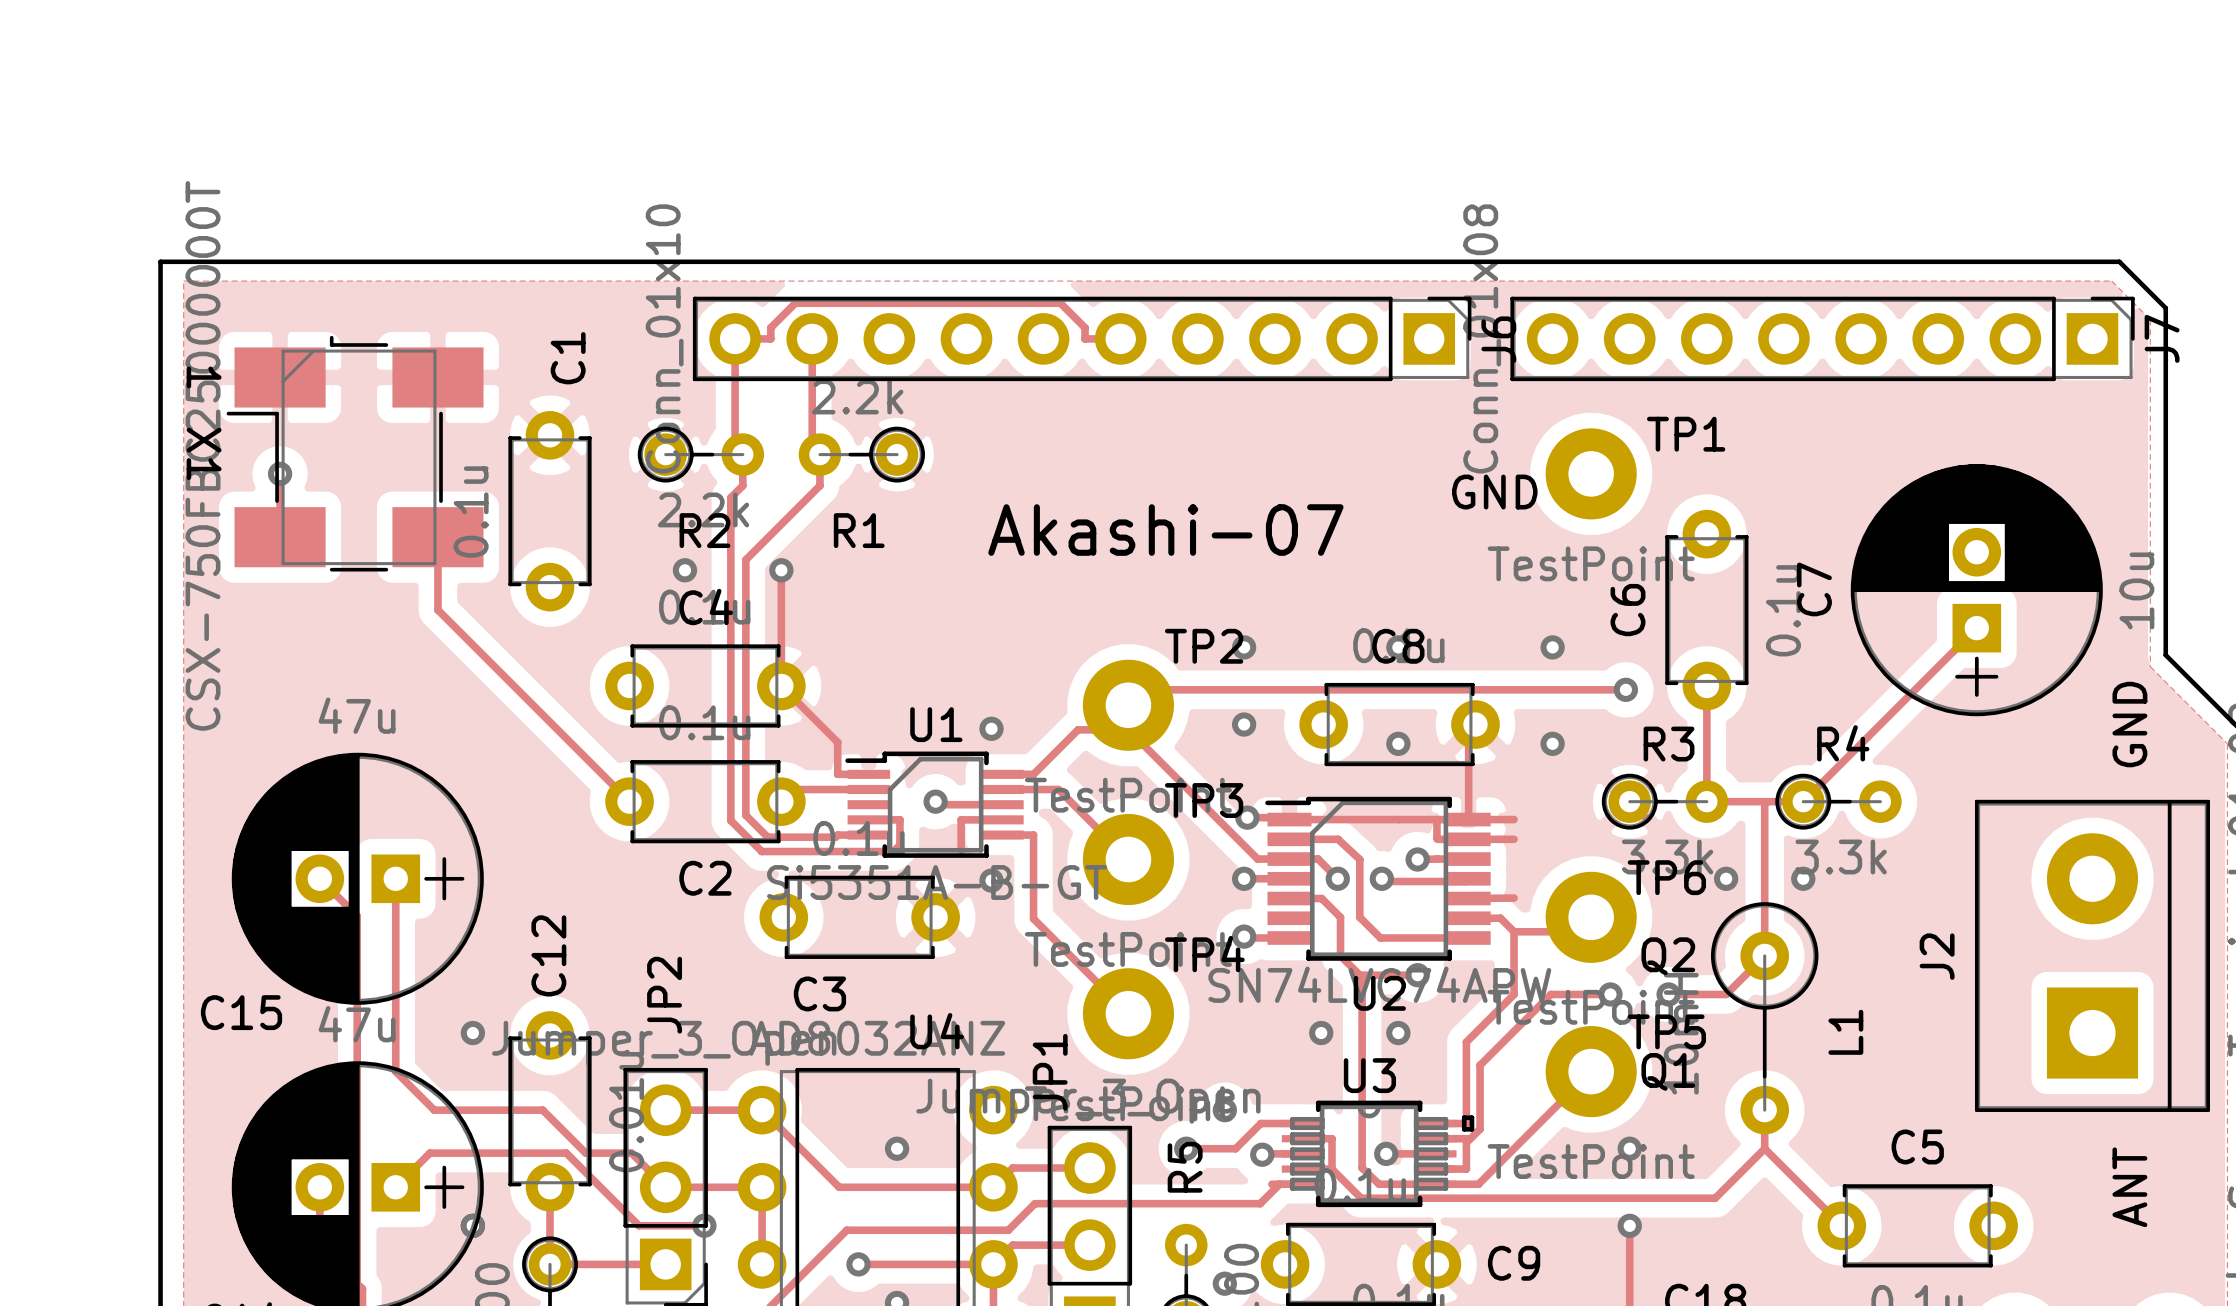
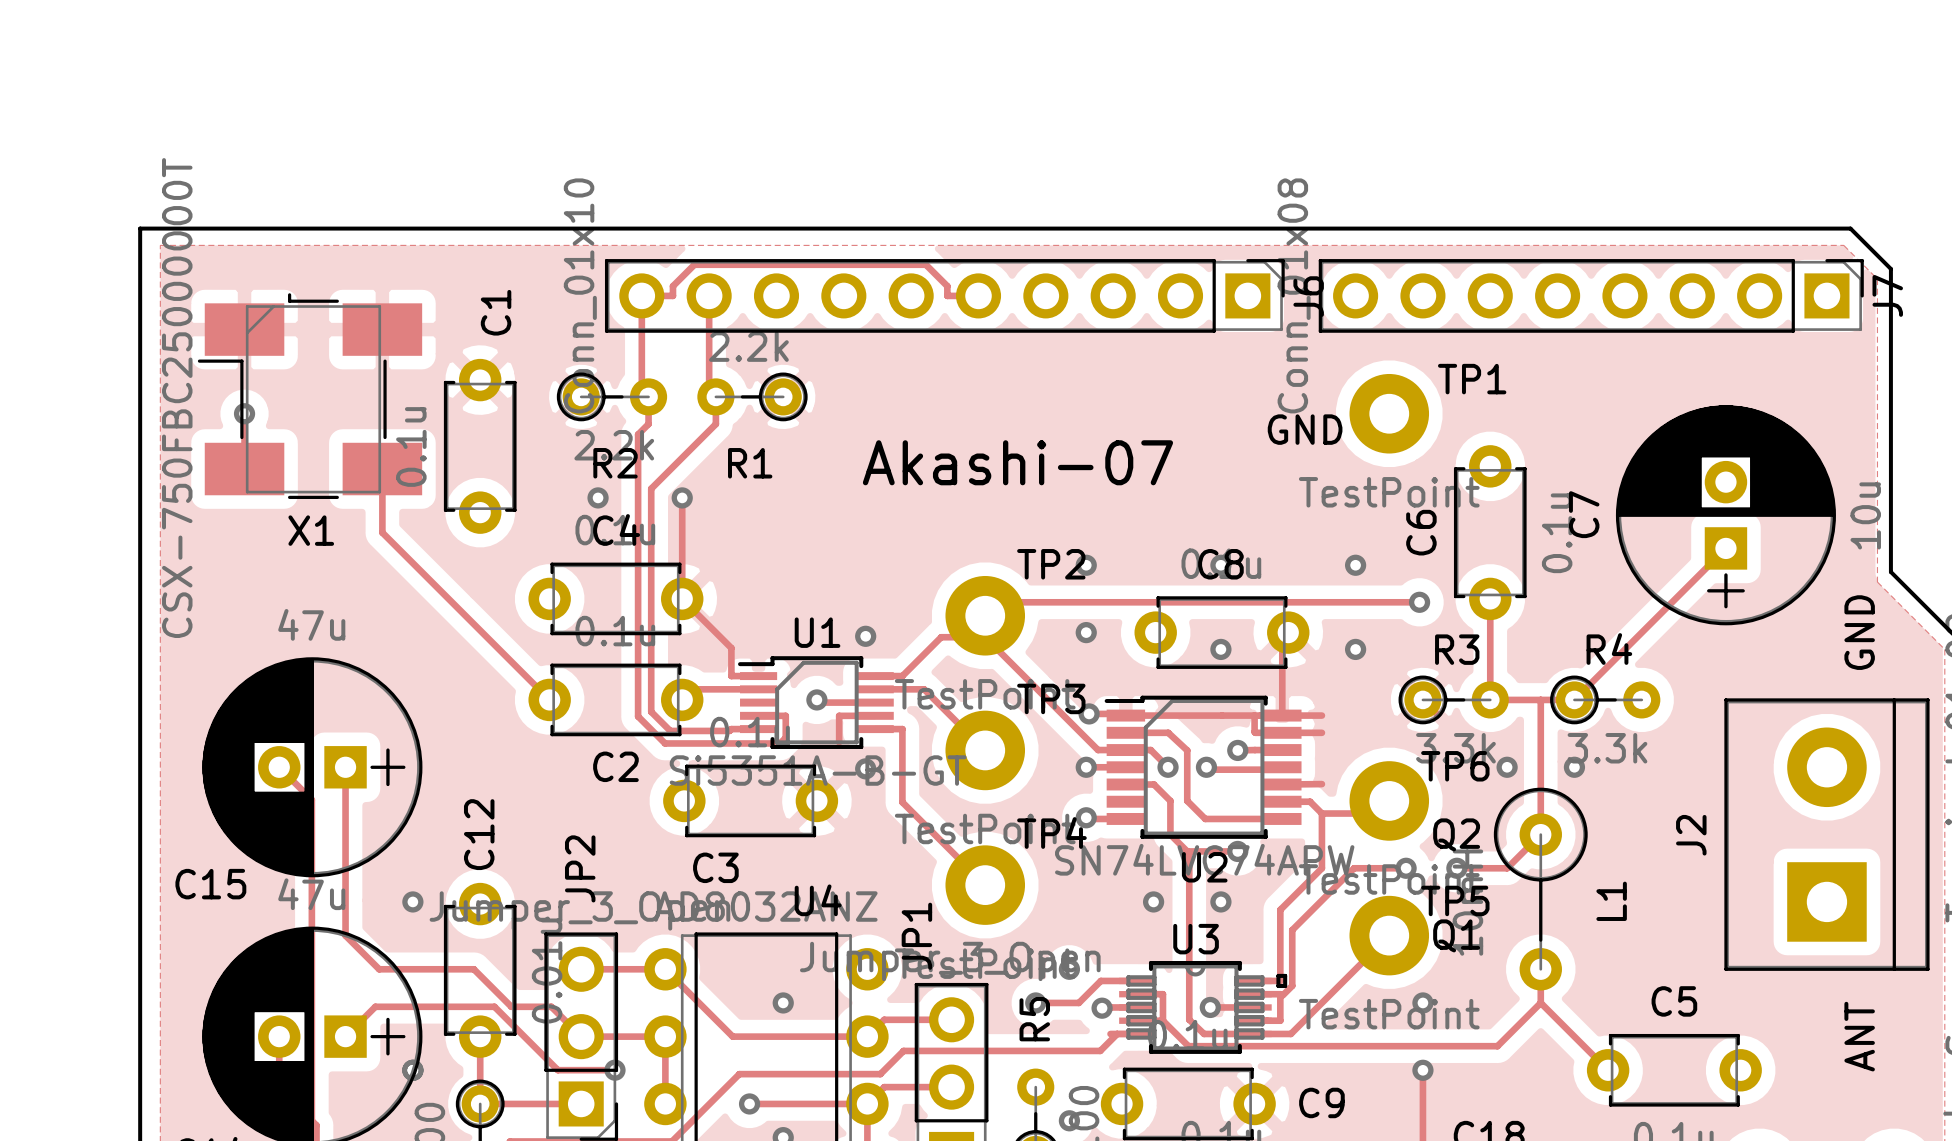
text: 1 (204, 377) -> none
X1 name rotation: 0° (204, 453) -> 90° counterclockwise (311, 530)
X1 name position: X1 (204, 453) -> X1 (311, 530)

